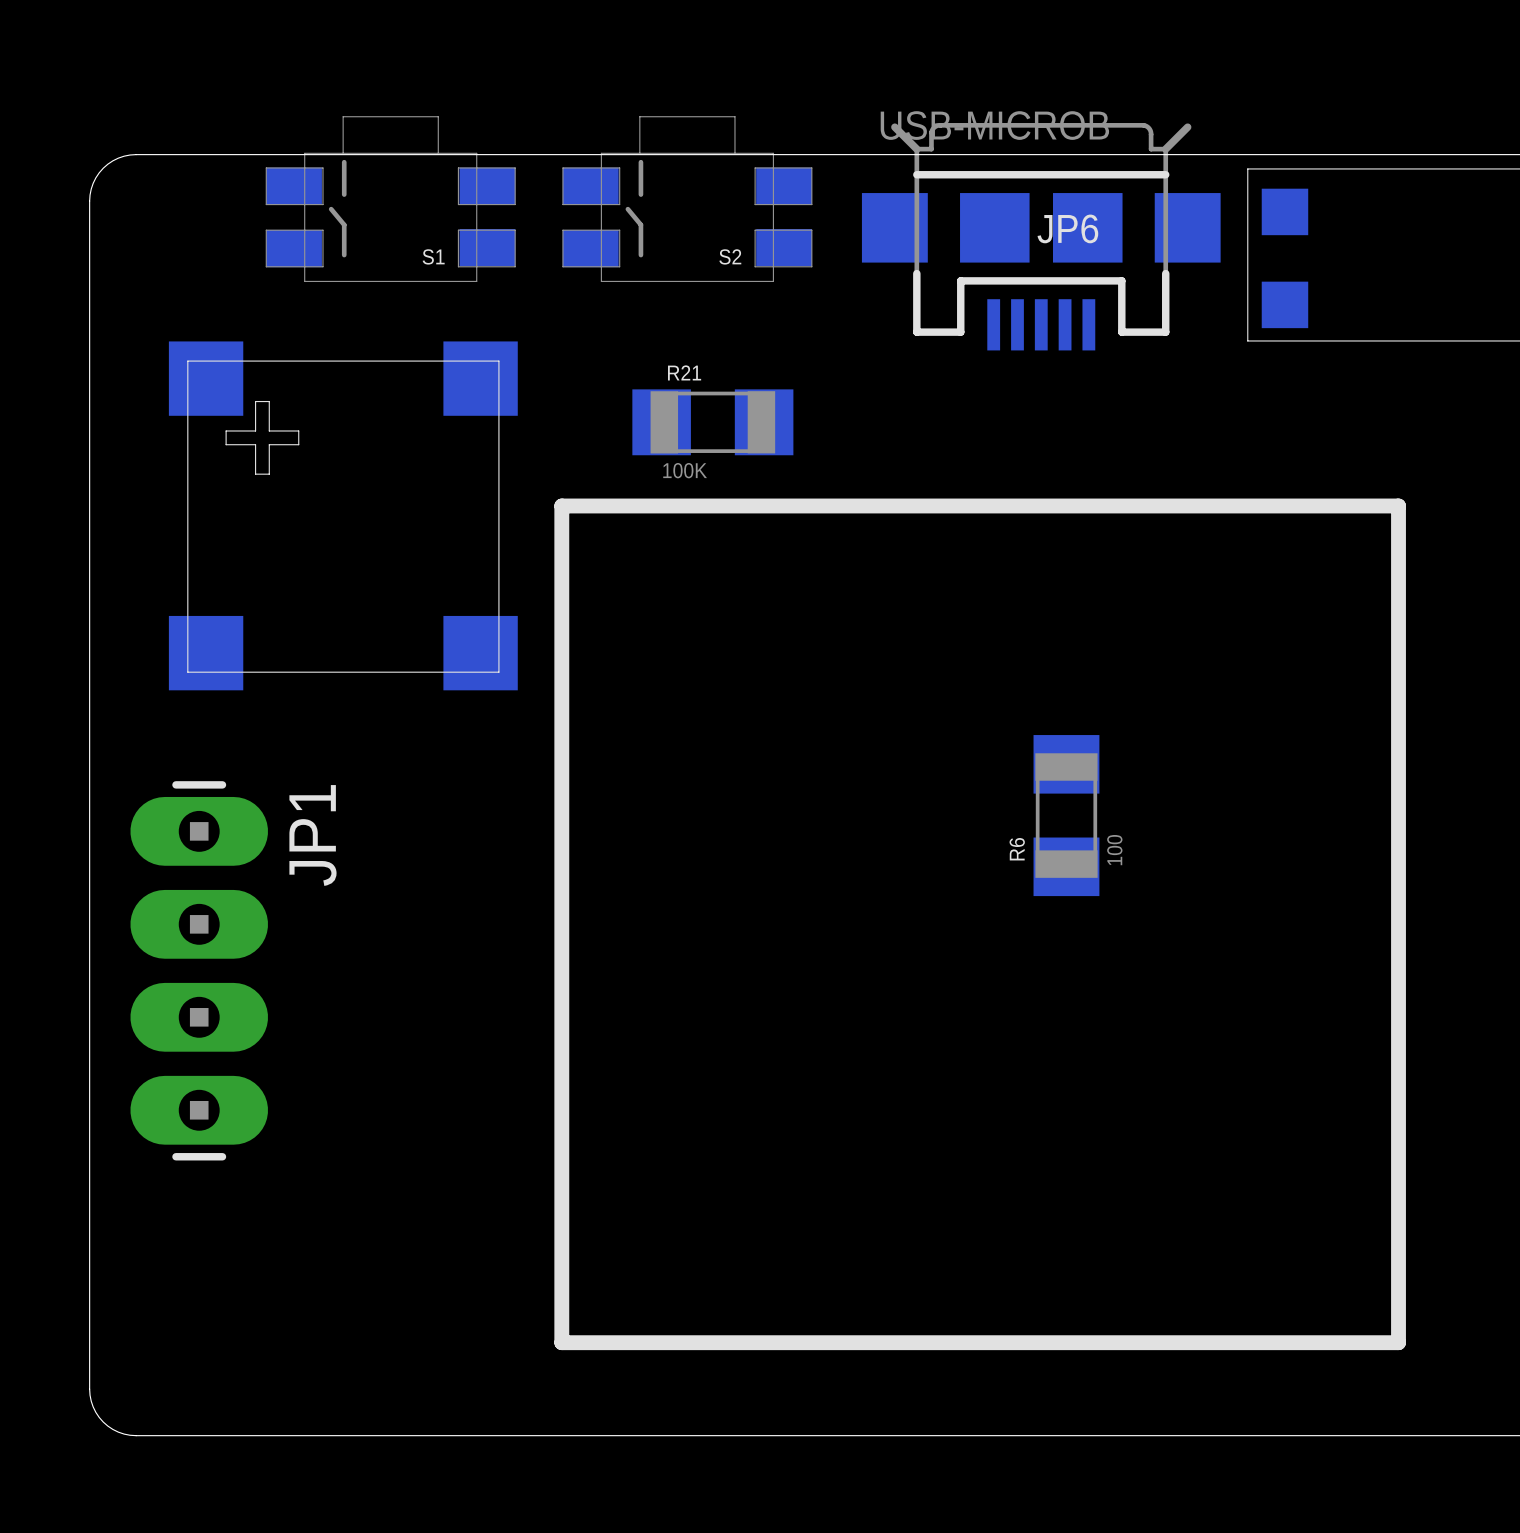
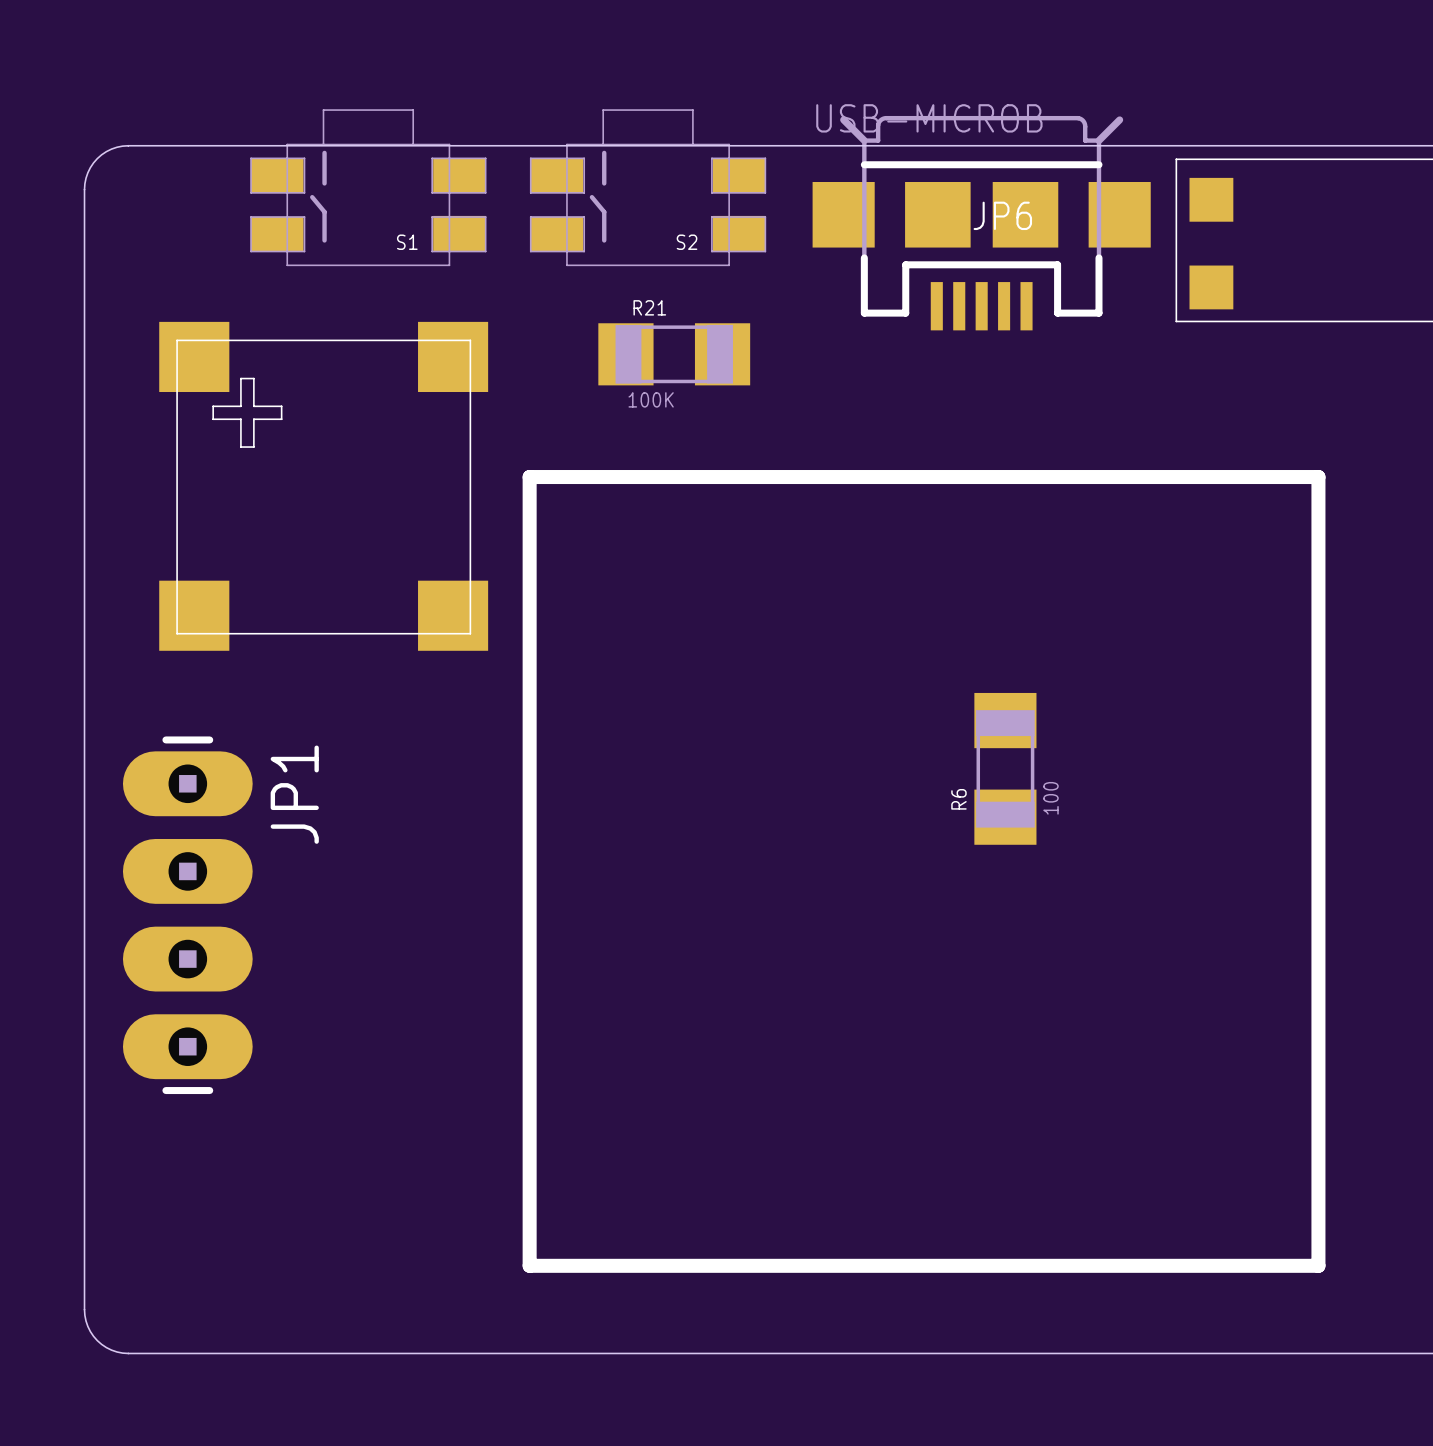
R21 position: (712, 422) -> (674, 354)

